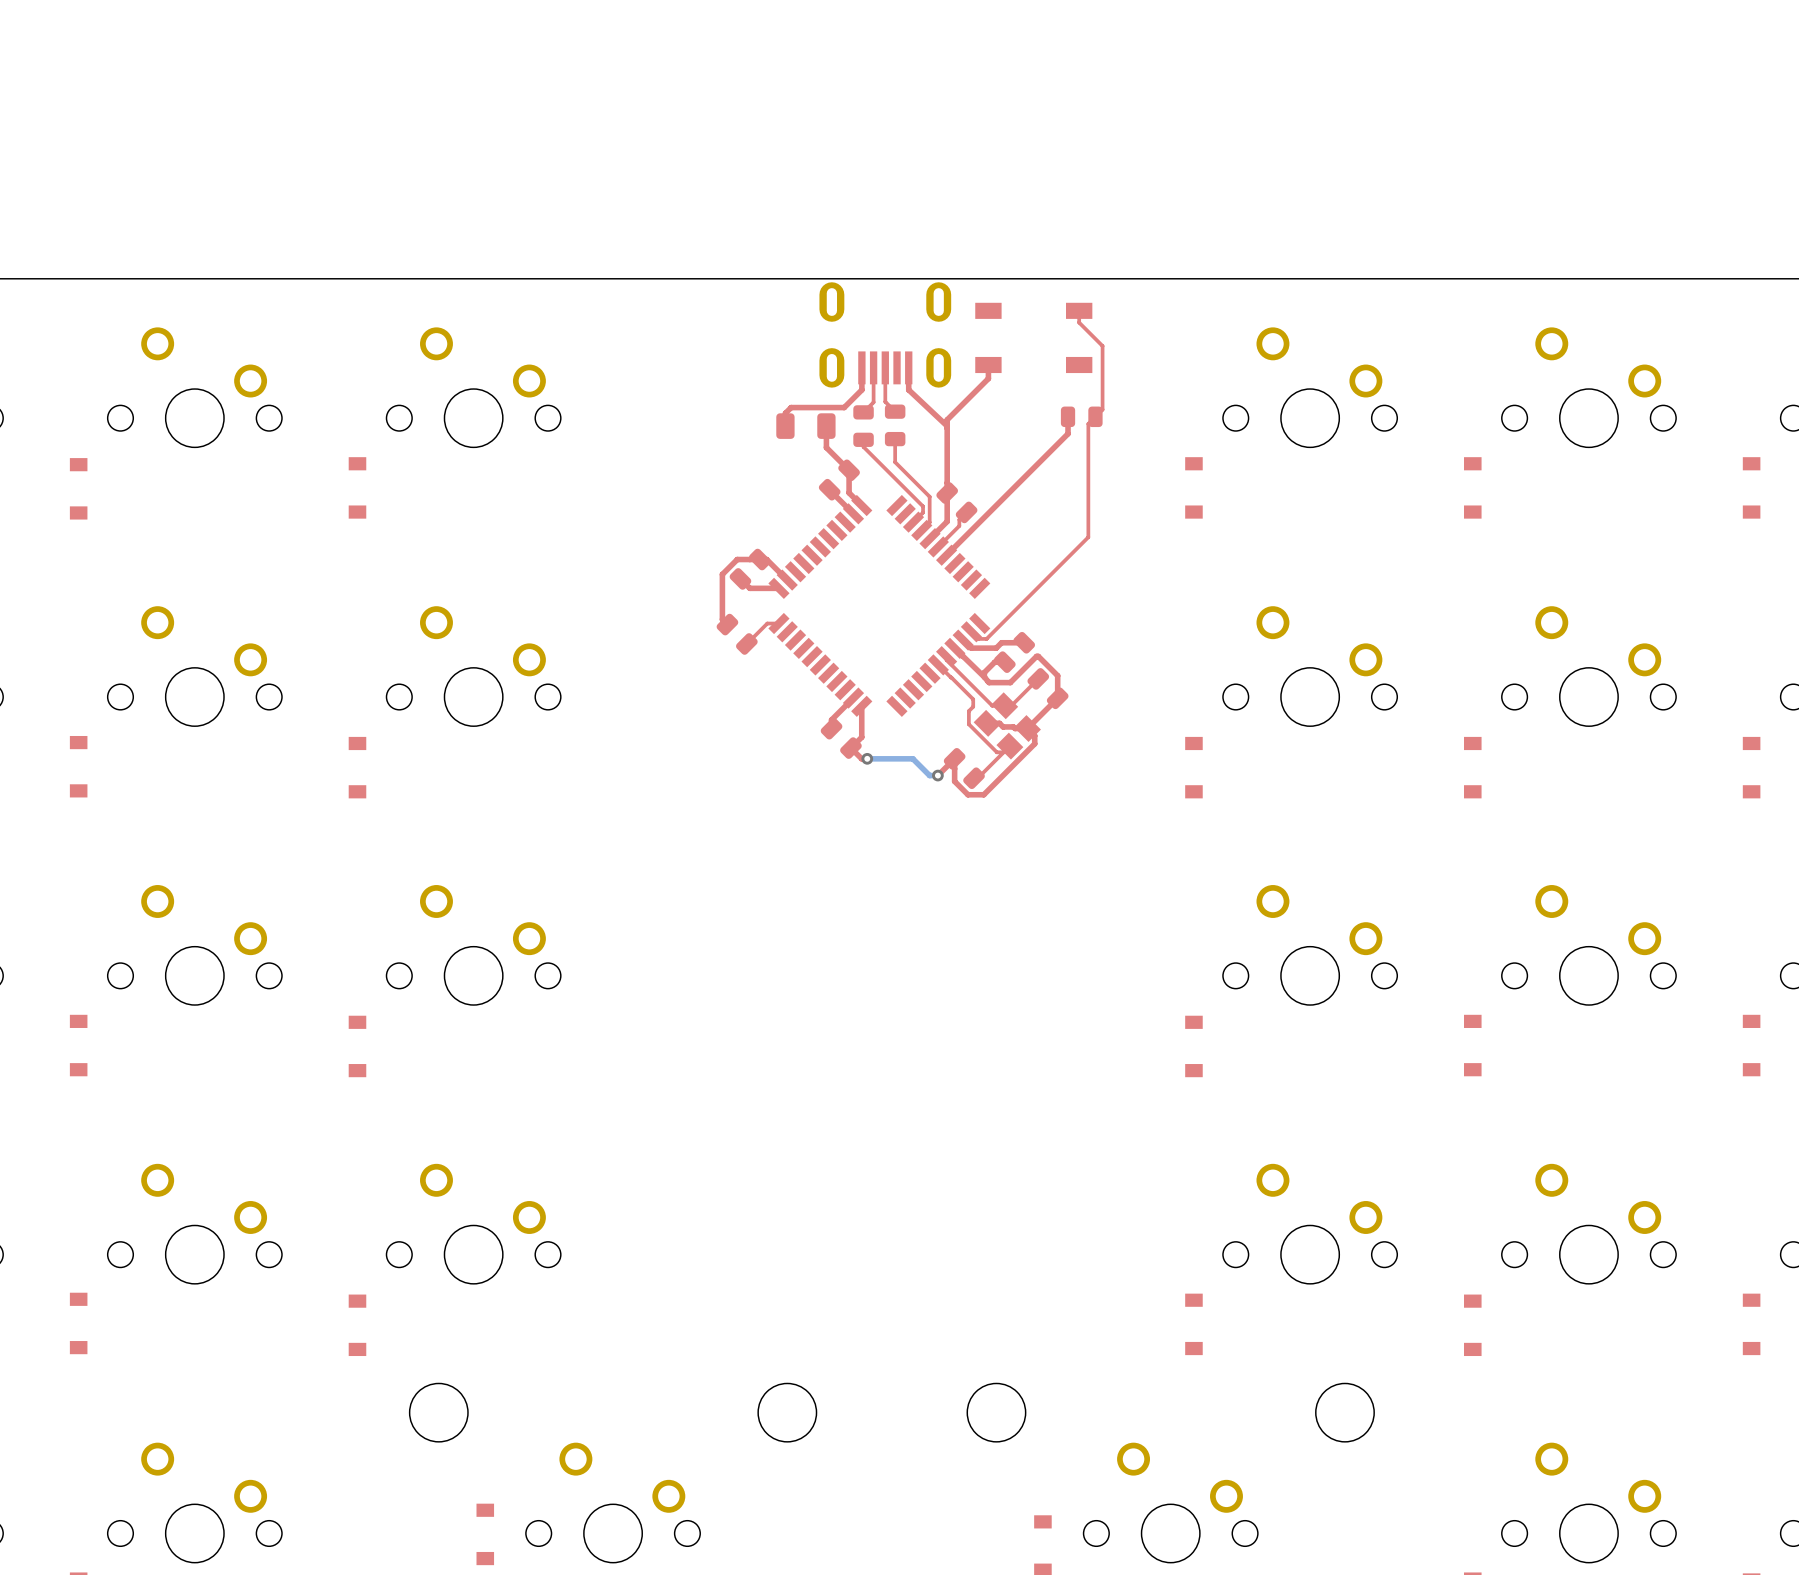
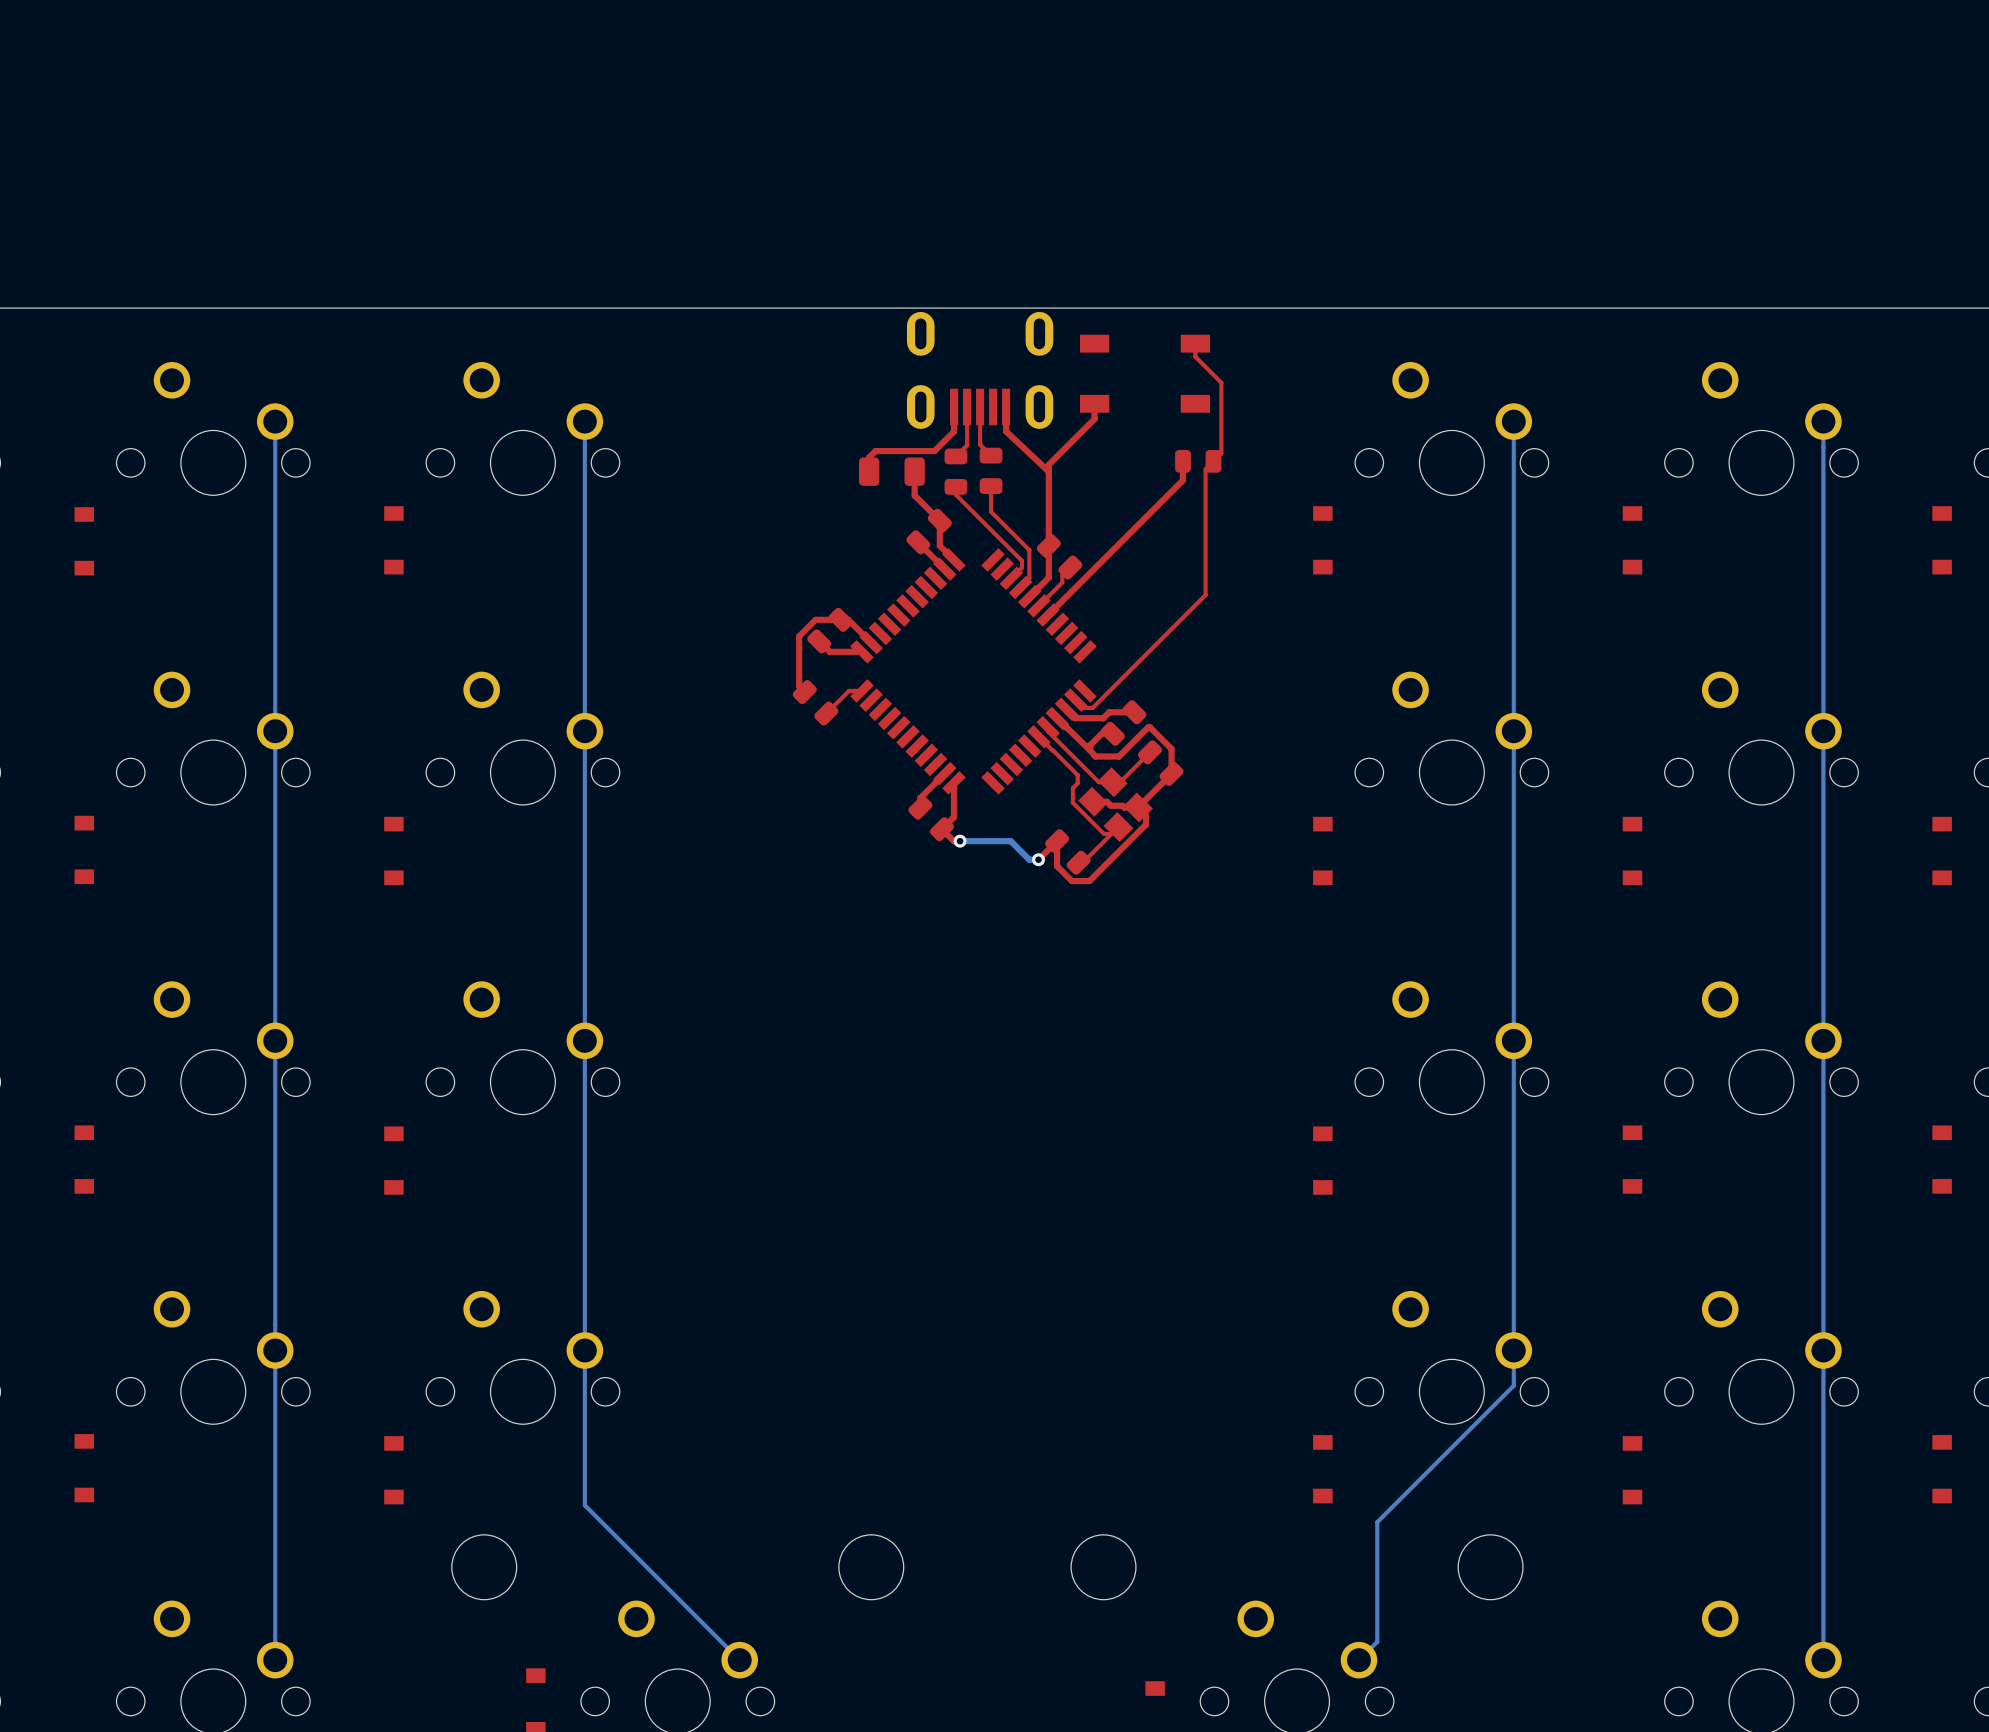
bottom track: none -> (275, 421) (275, 1660)
bottom track: none -> (584, 421) (584, 1505) (739, 1660)
bottom track: none -> (1513, 421) (1513, 1385) (1377, 1522) (1377, 1641) (1358, 1660)
bottom track: none -> (1823, 421) (1823, 1660)

